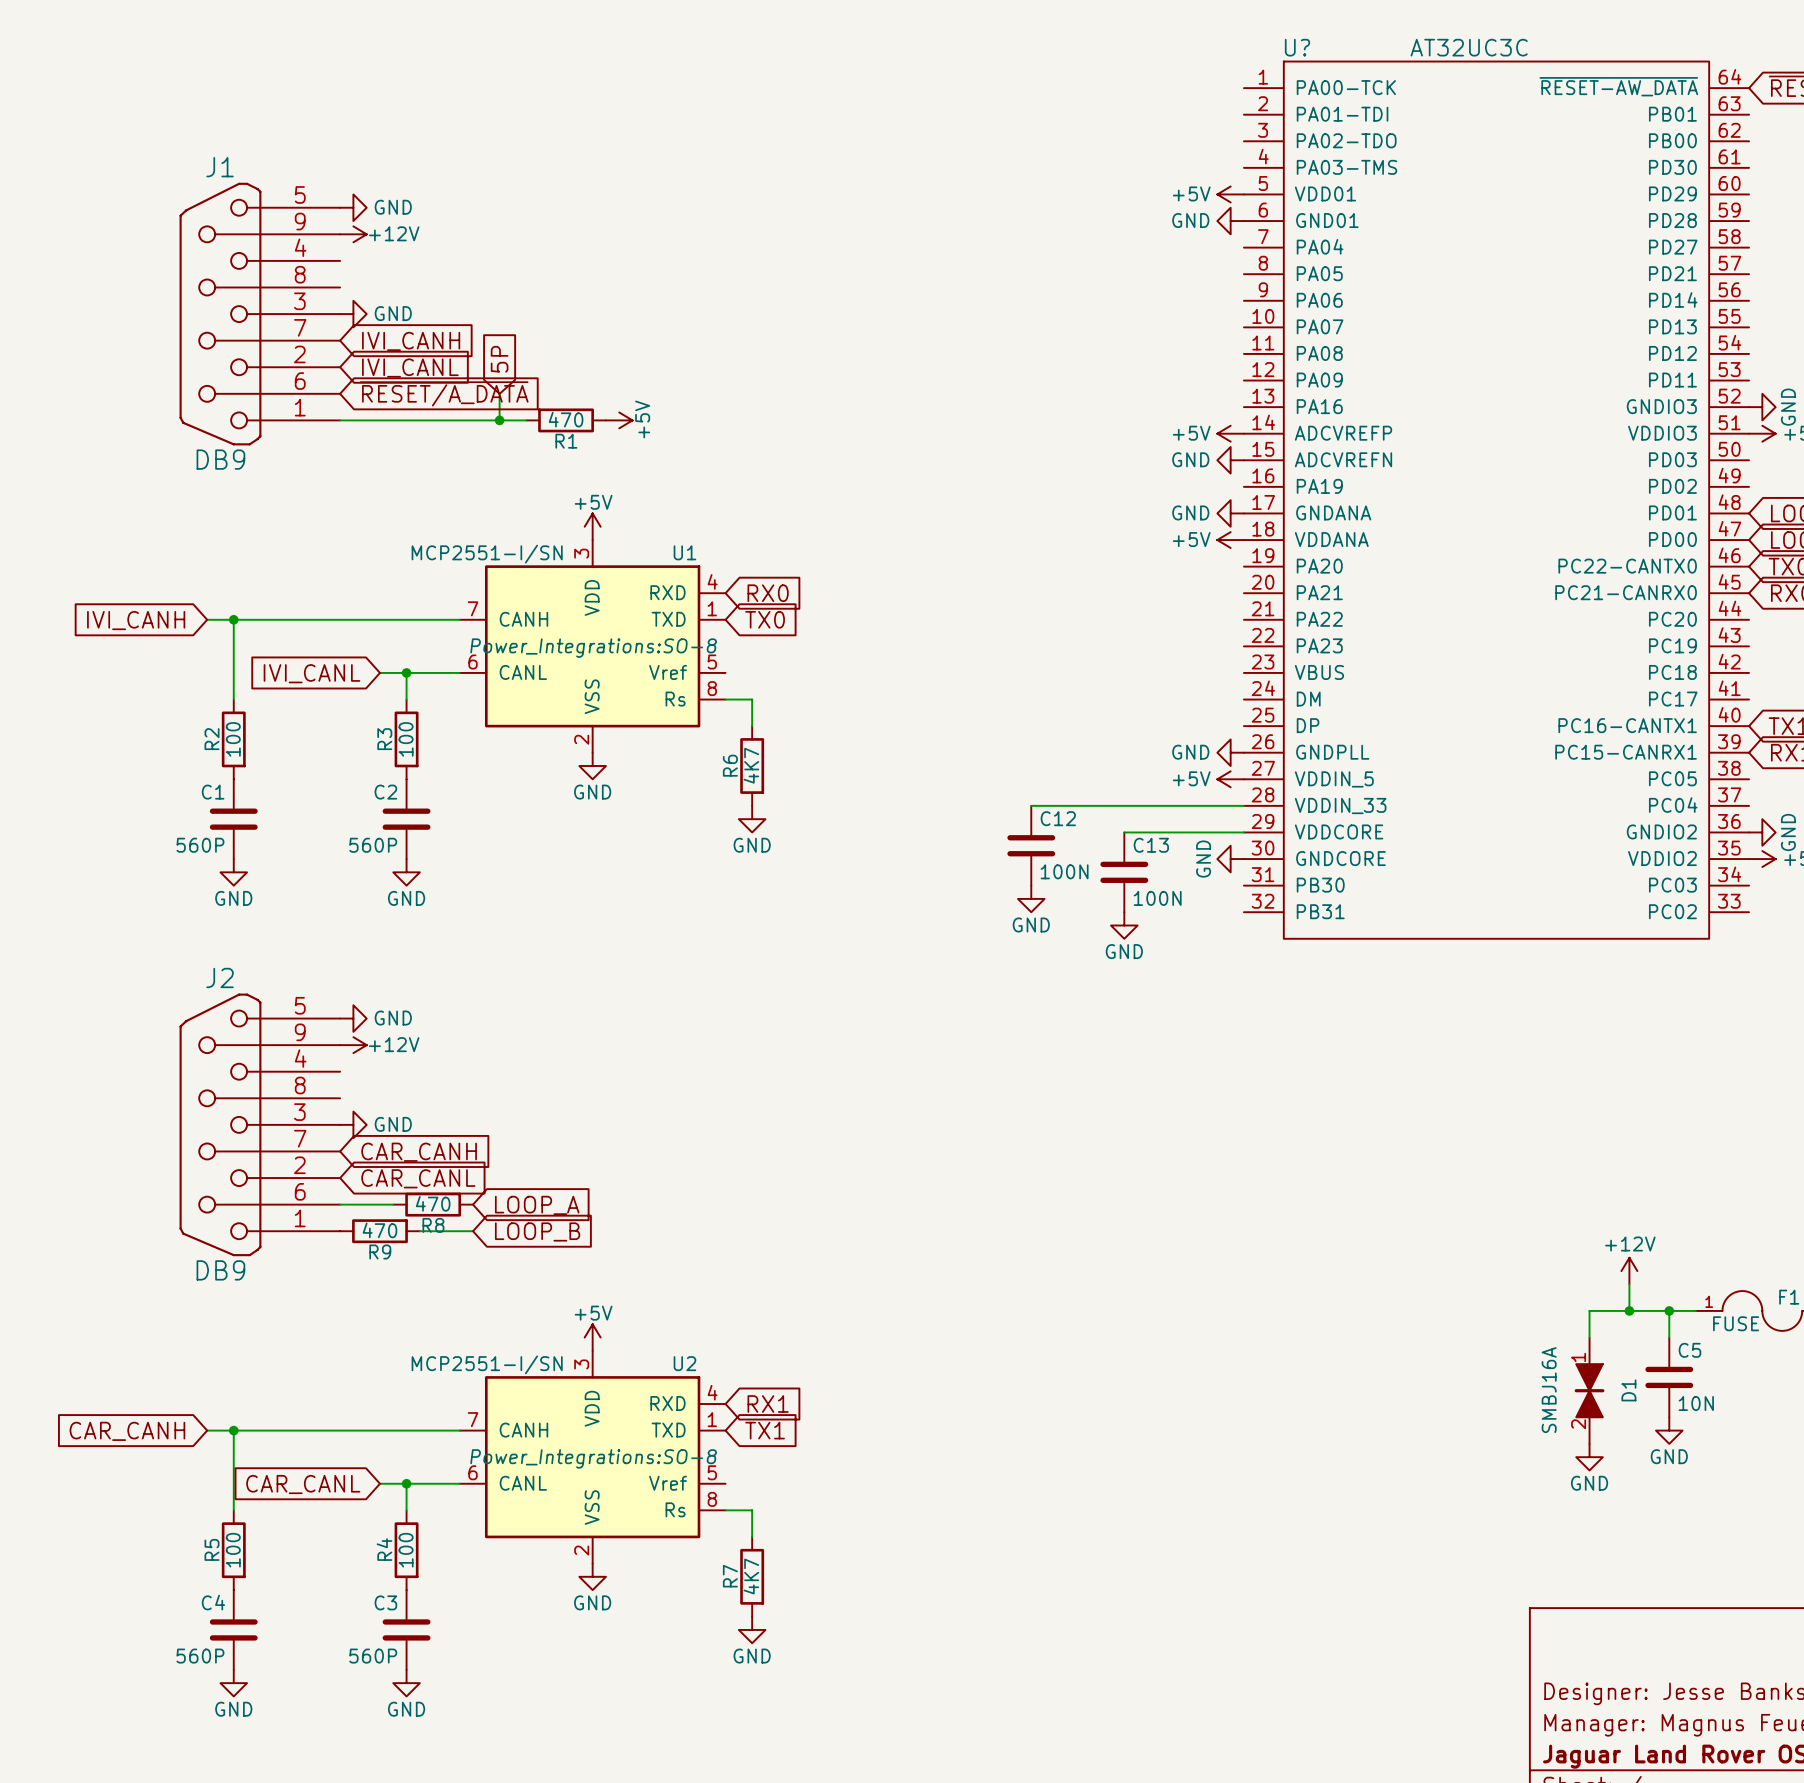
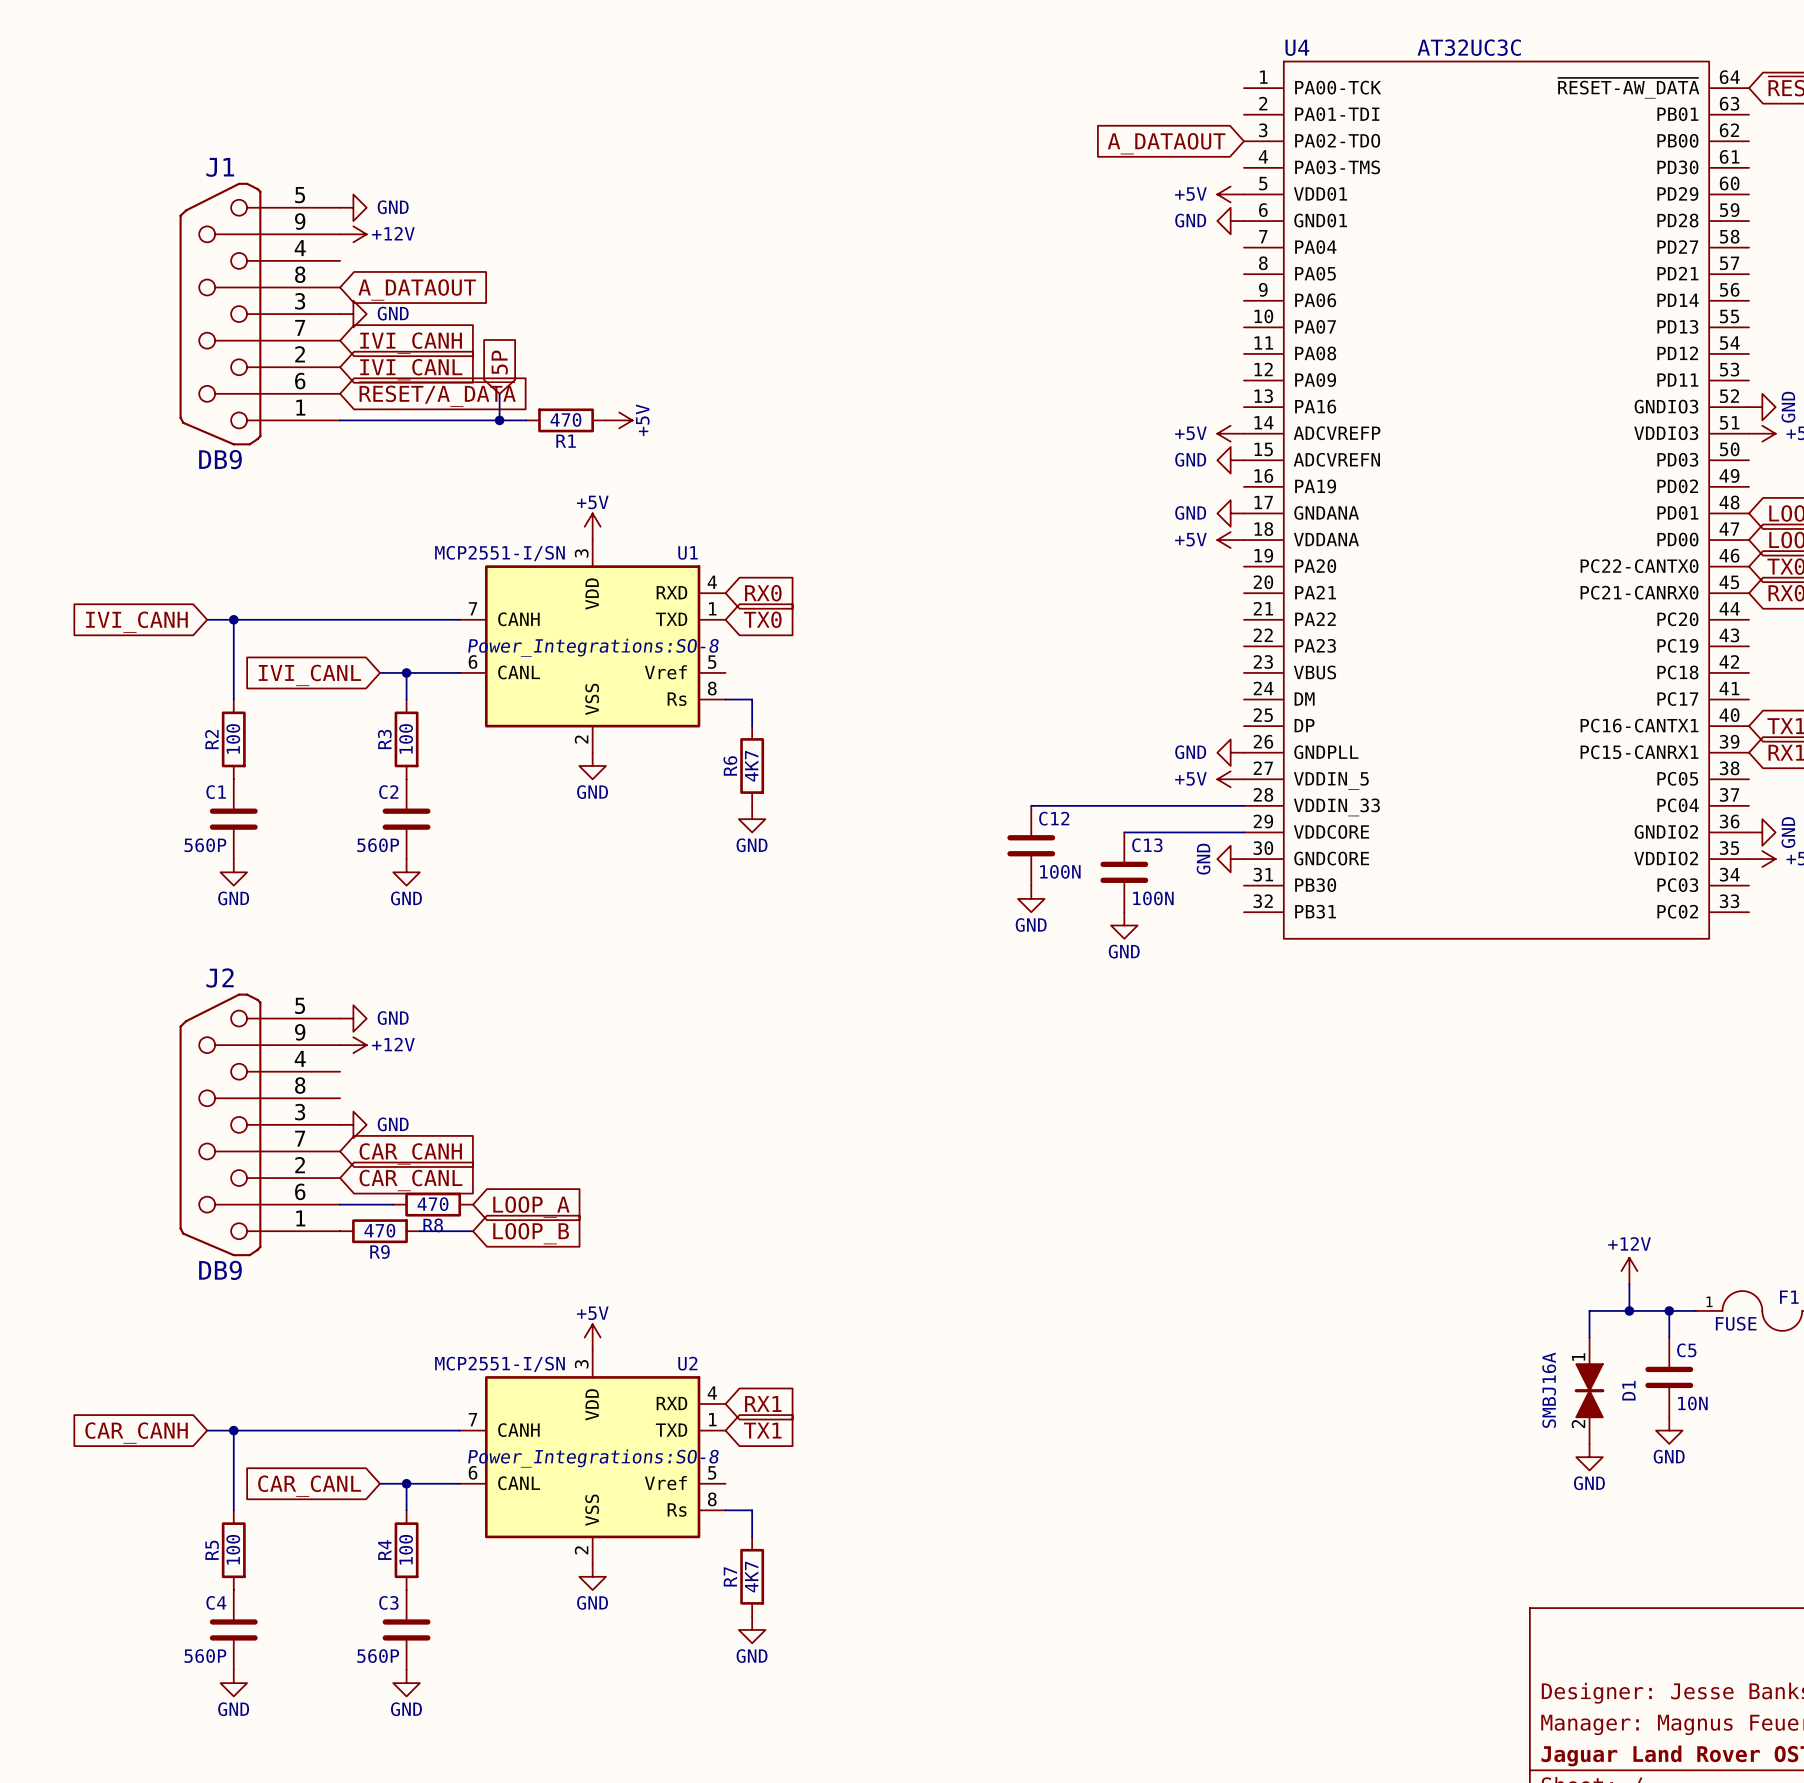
U? name: U? (1297, 47) -> U4 (1297, 47)
global label: none -> A_DATAOUT (1166, 143)
global label: none -> A_DATAOUT (417, 289)

